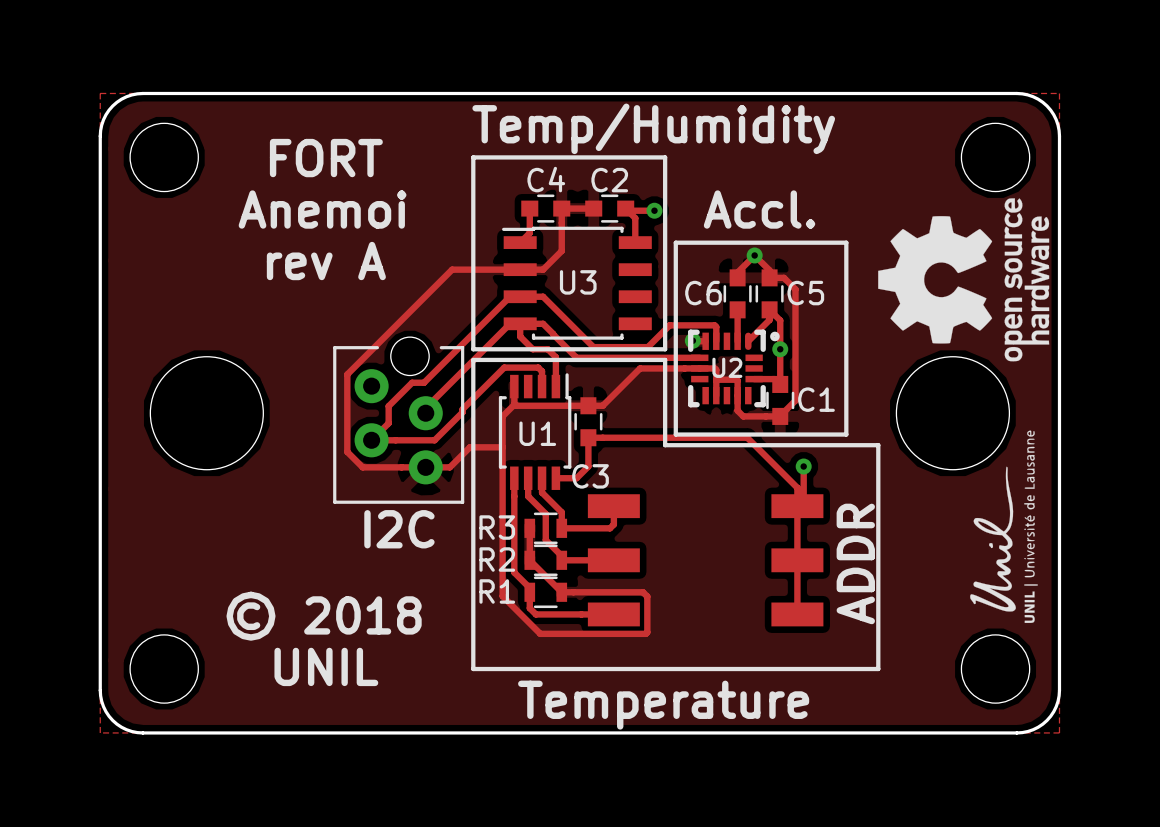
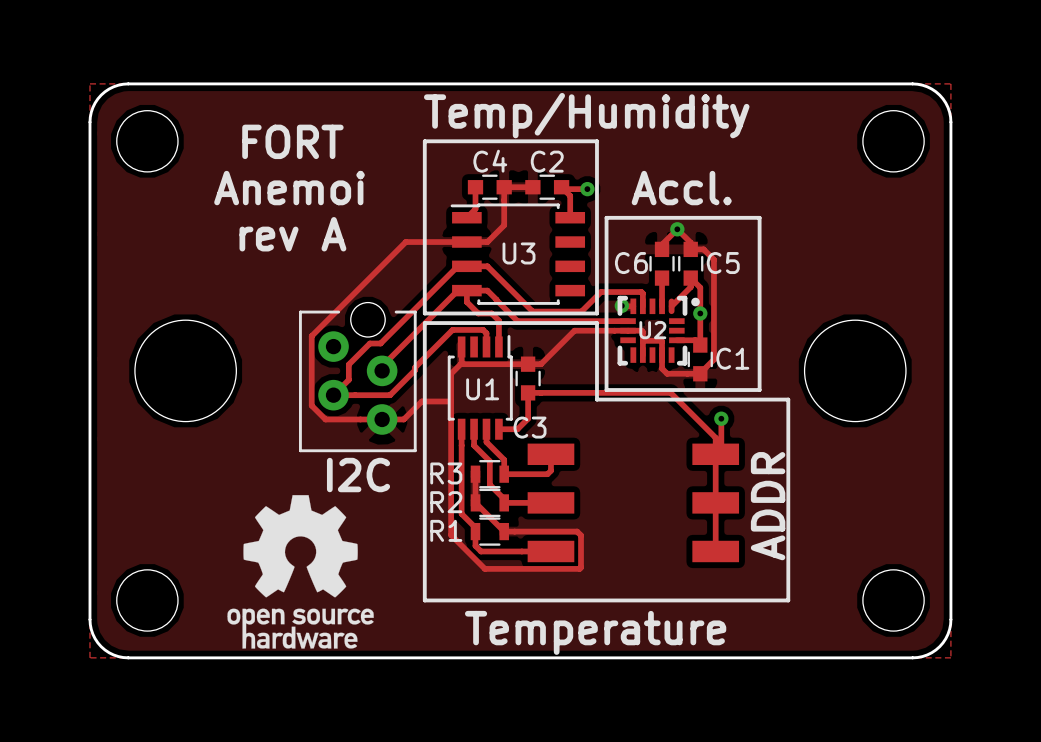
drawing: [878, 198, 1050, 362] -> none
drawing: [970, 430, 1038, 623] -> none
drawing: none -> [227, 495, 374, 649]
text: © 2018 (324, 616) -> none
text: UNIL (326, 666) -> none

